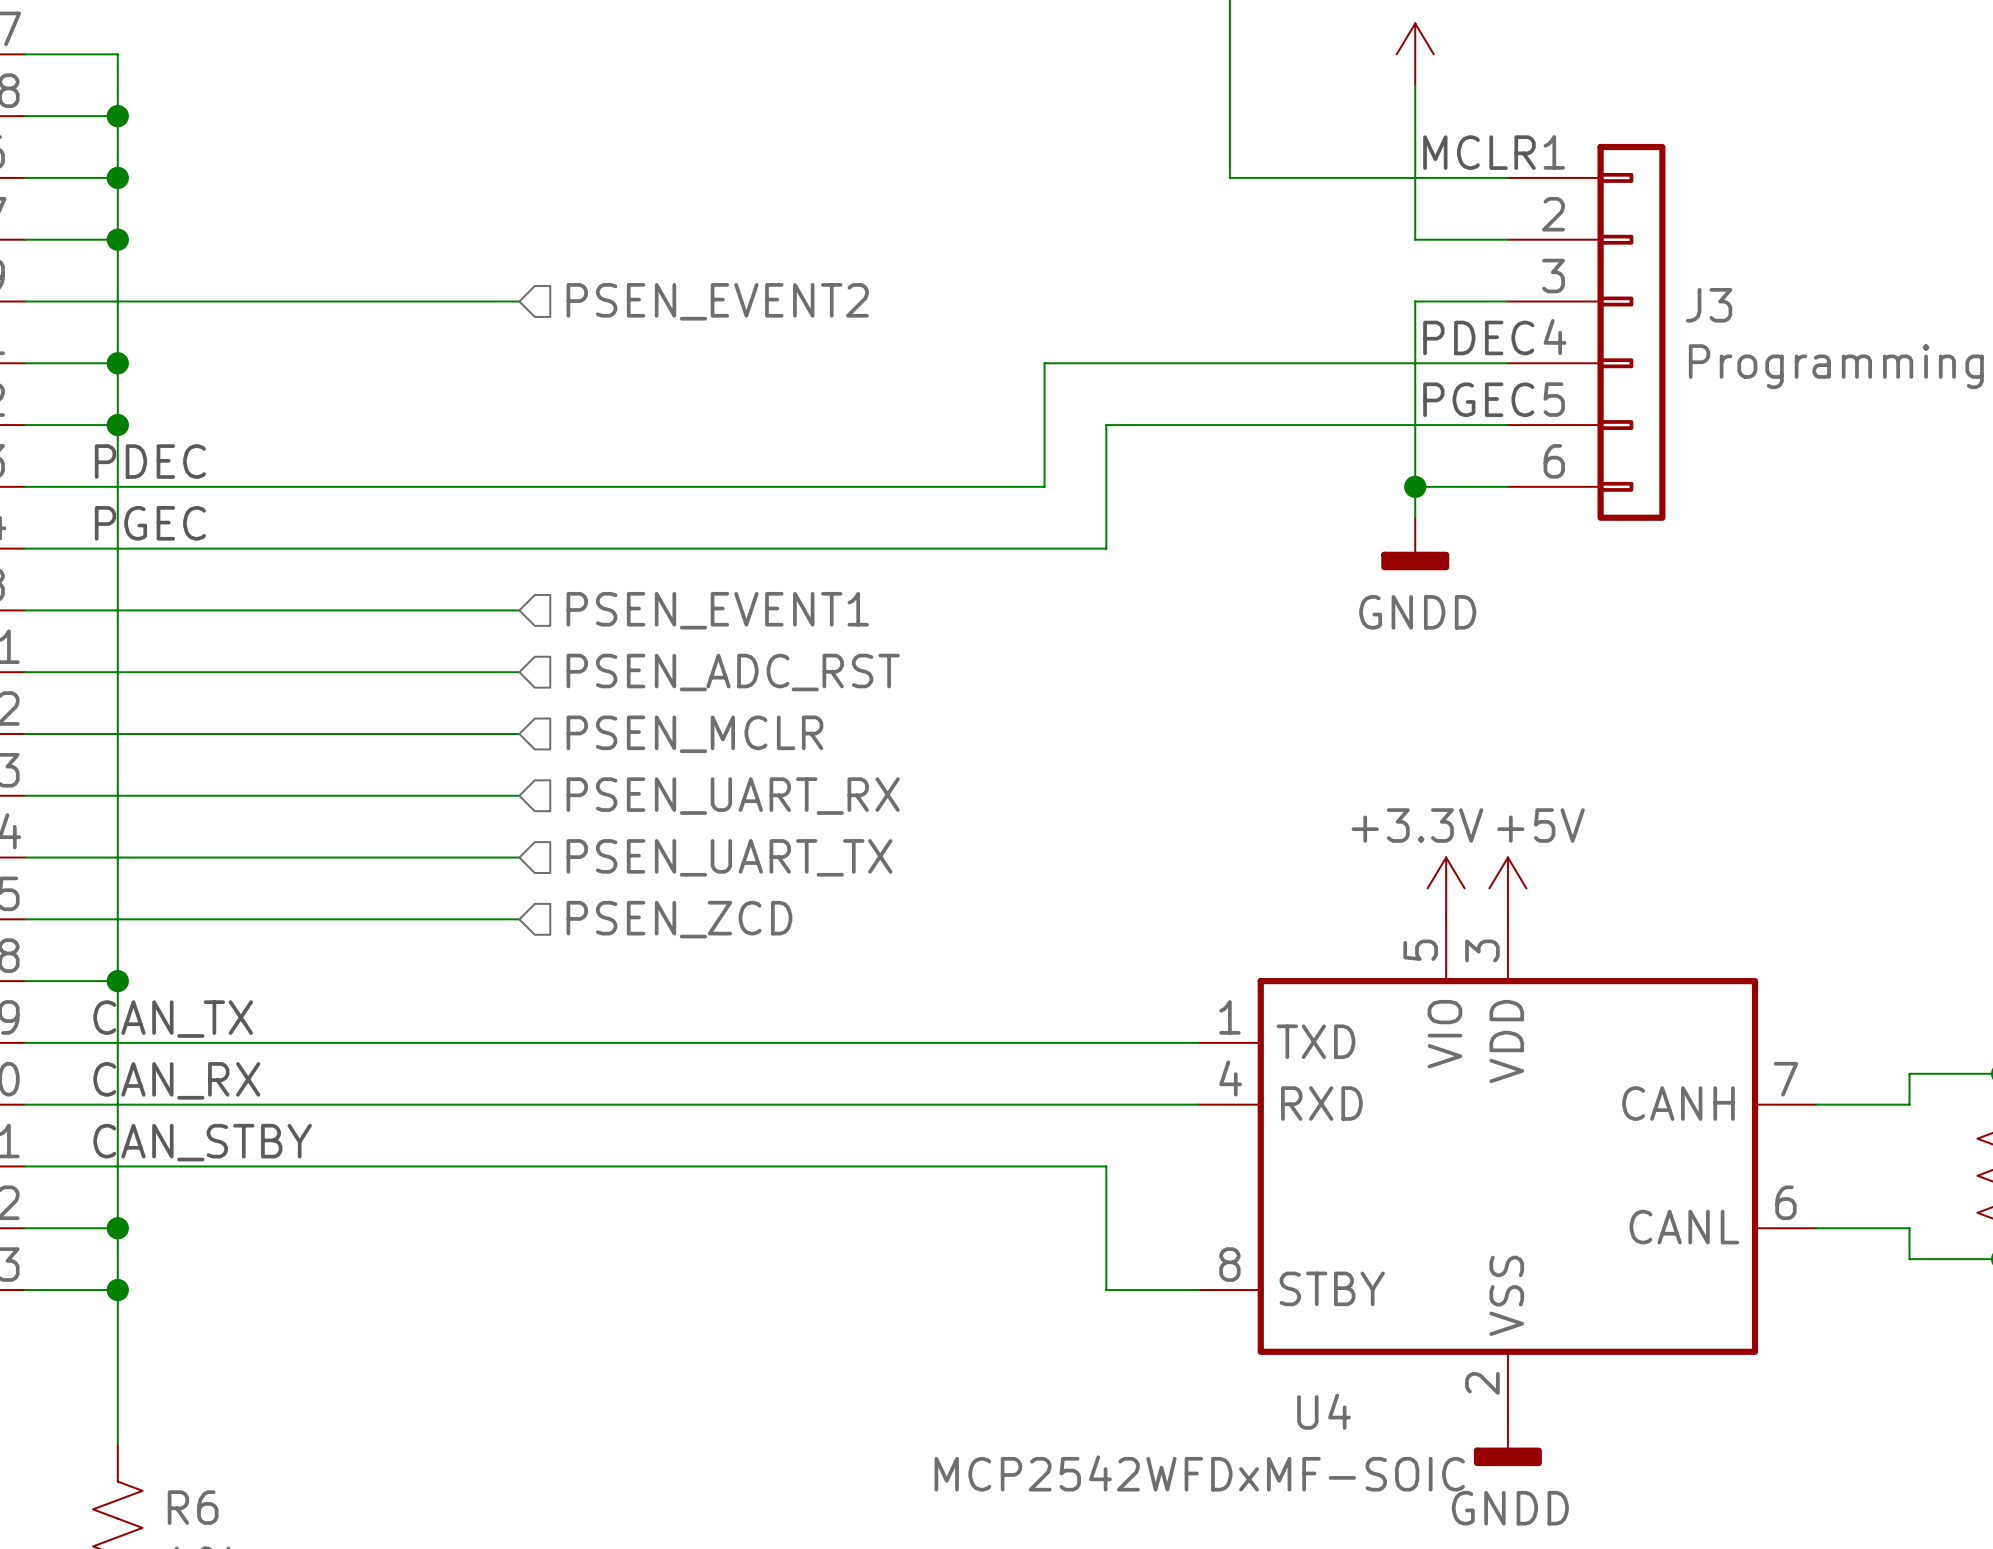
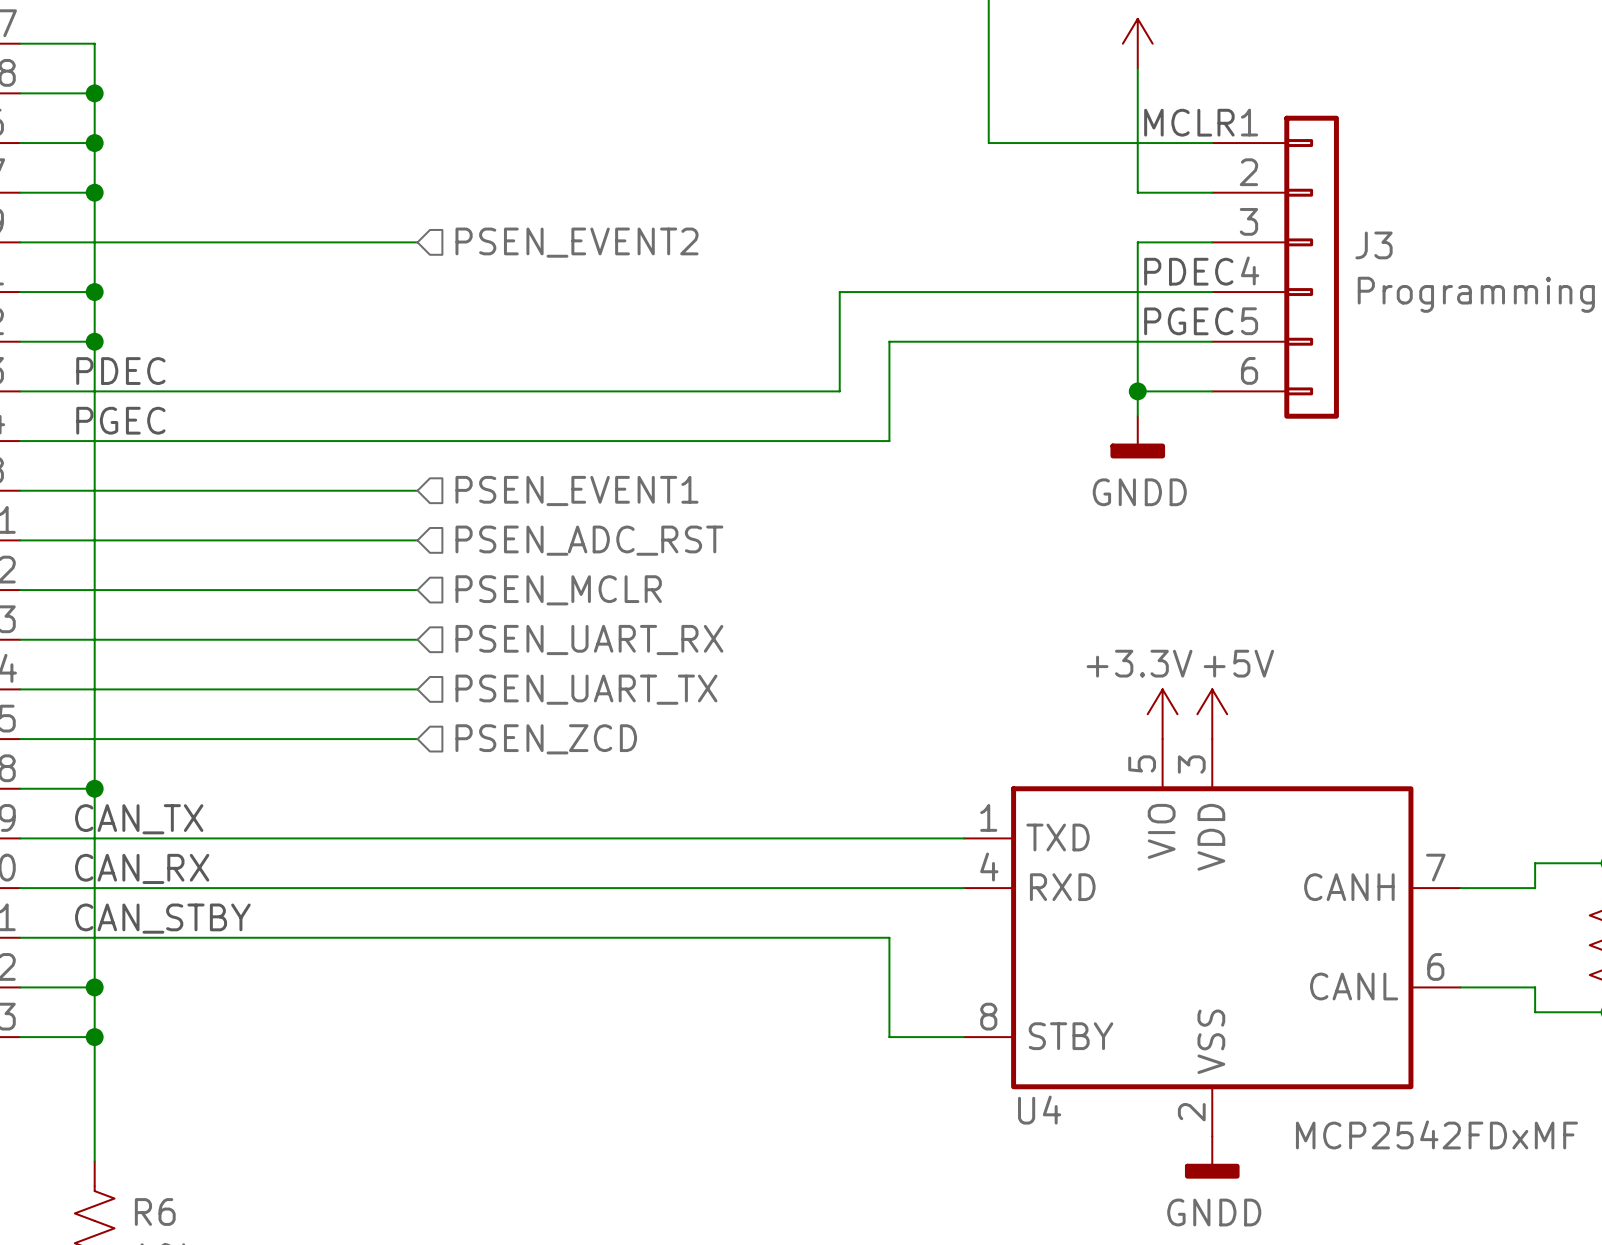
U4 name position: U4 (1324, 1411) -> U4 (1039, 1110)
U4 value: MCP2542WFDxMF-SOIC (1199, 1473) -> MCP2542FDxMF (1436, 1134)

